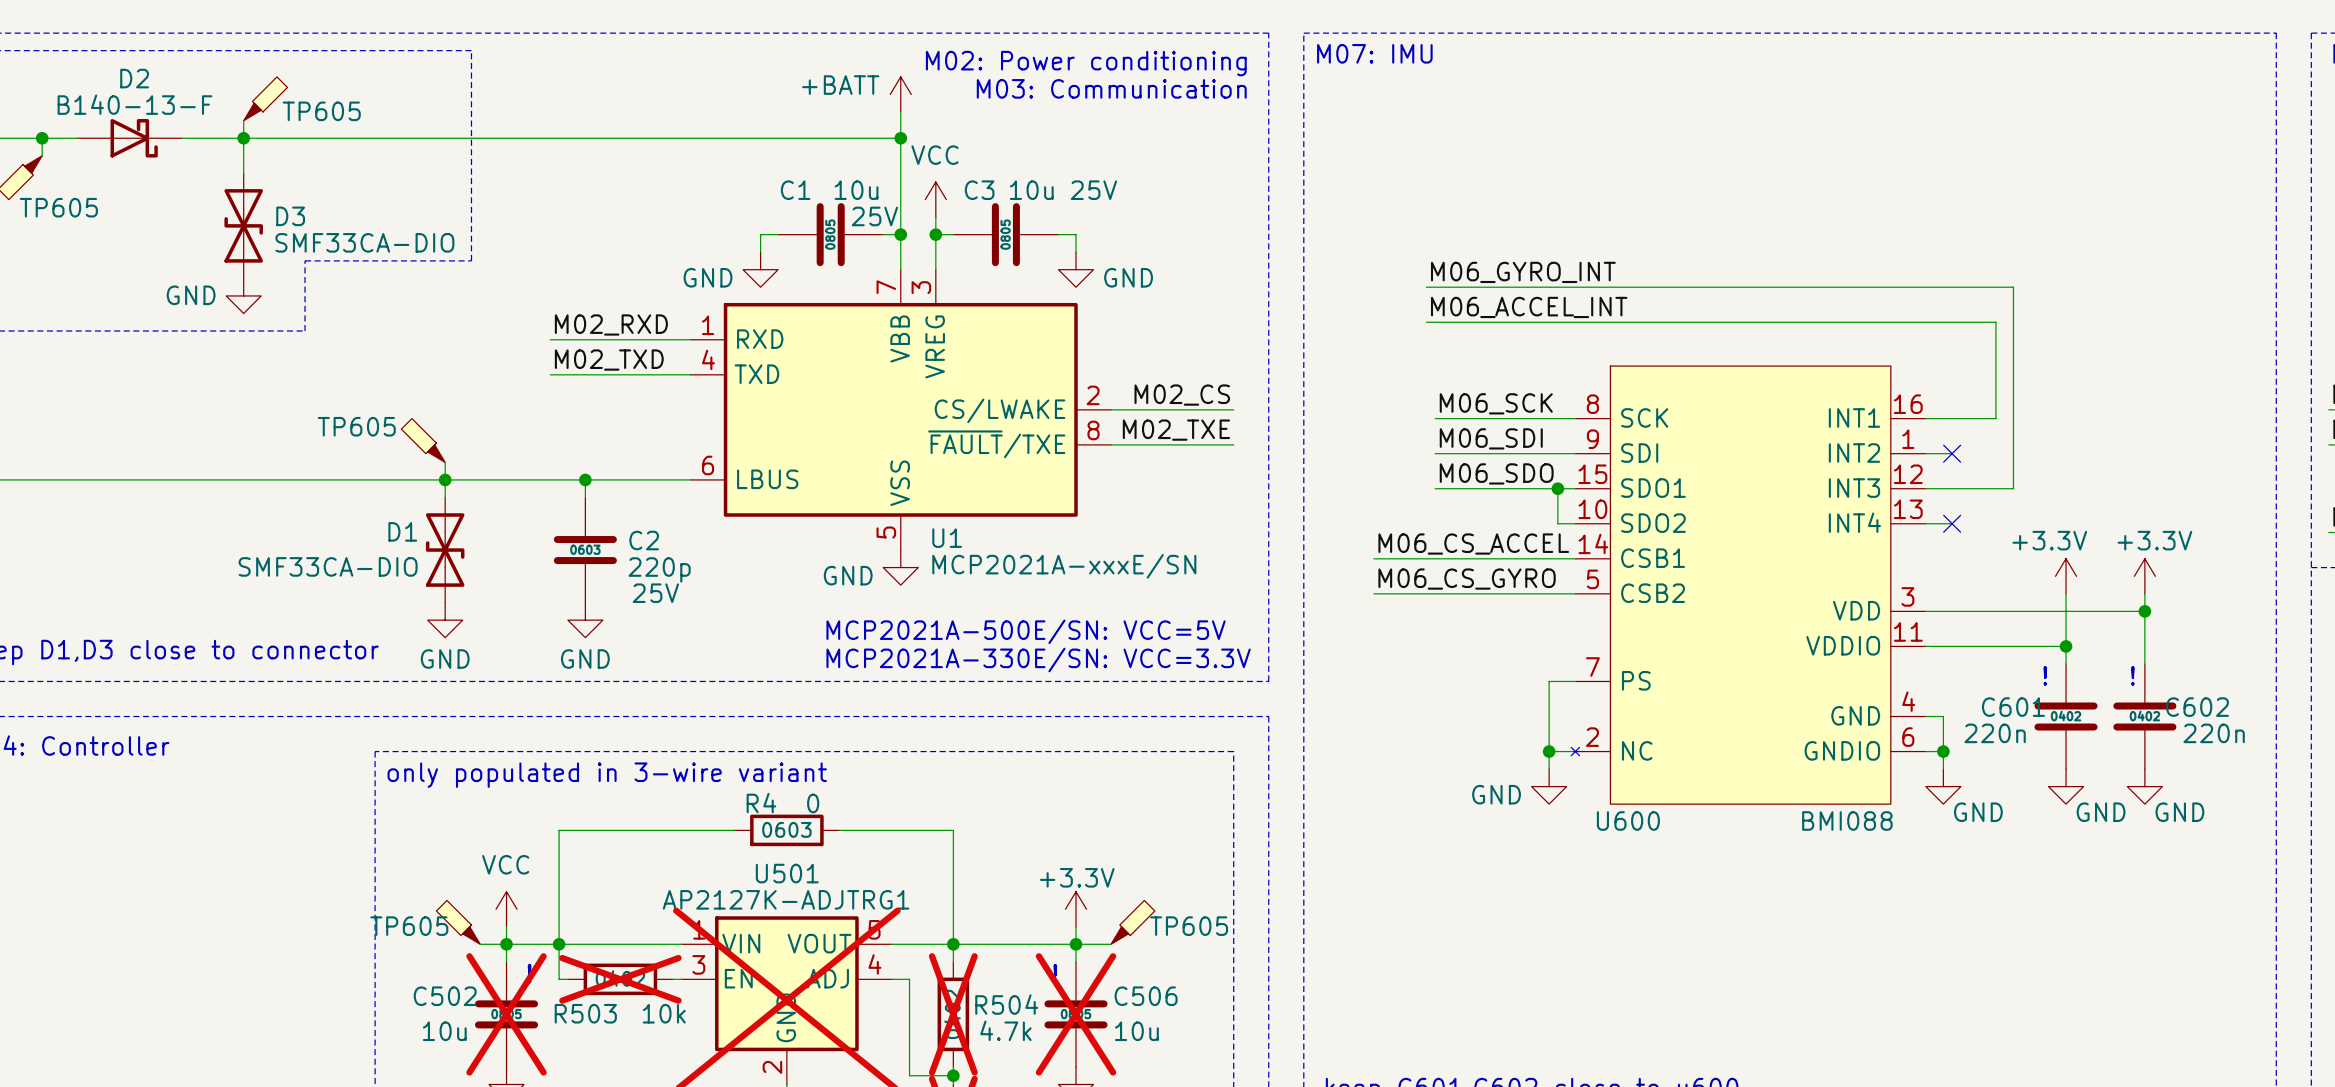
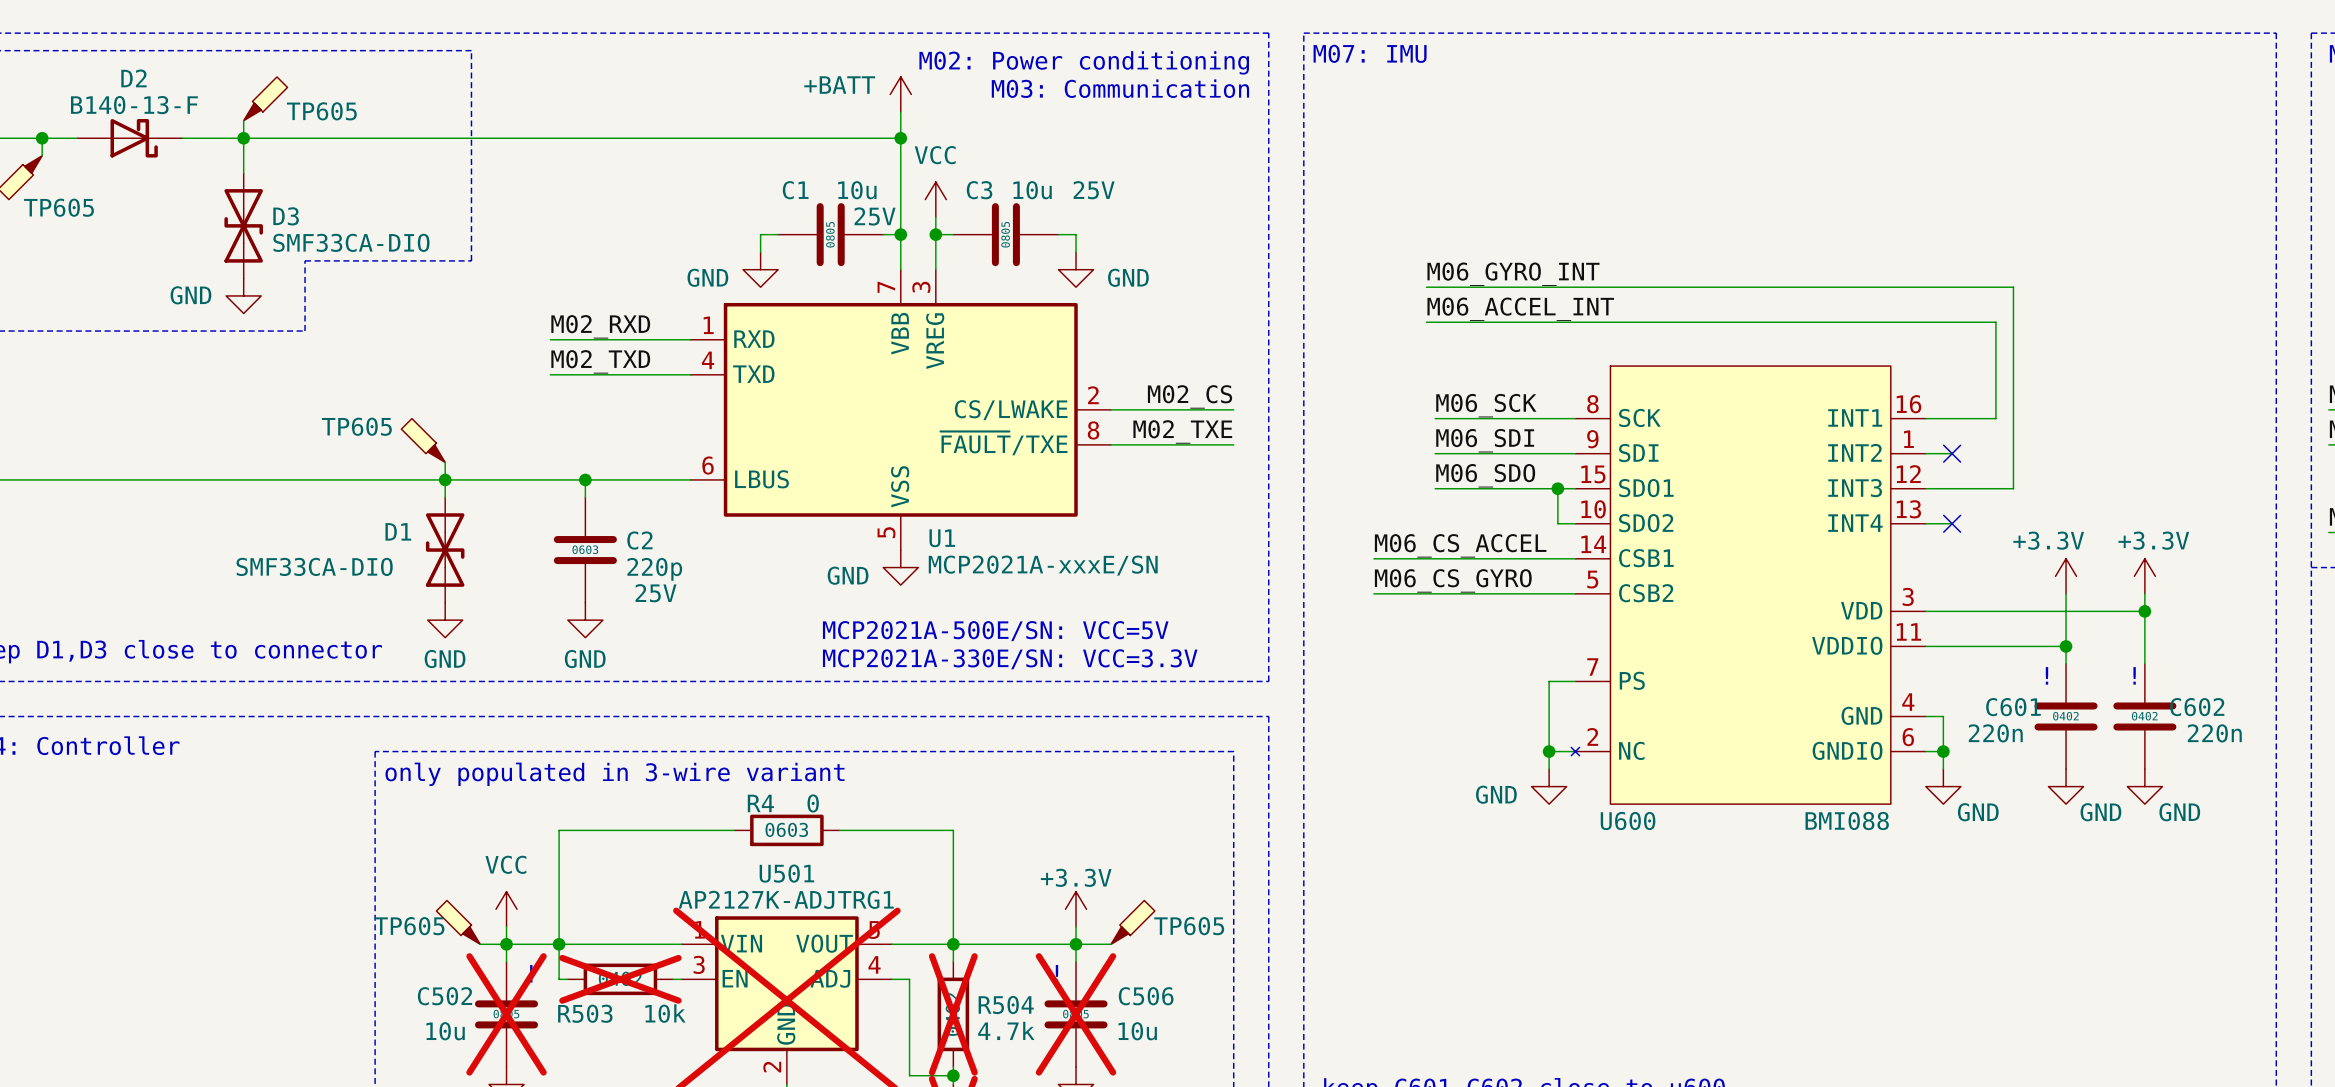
R4 text: none -> 0603 (786, 829)
R4 text: 0603 (786, 829) -> none

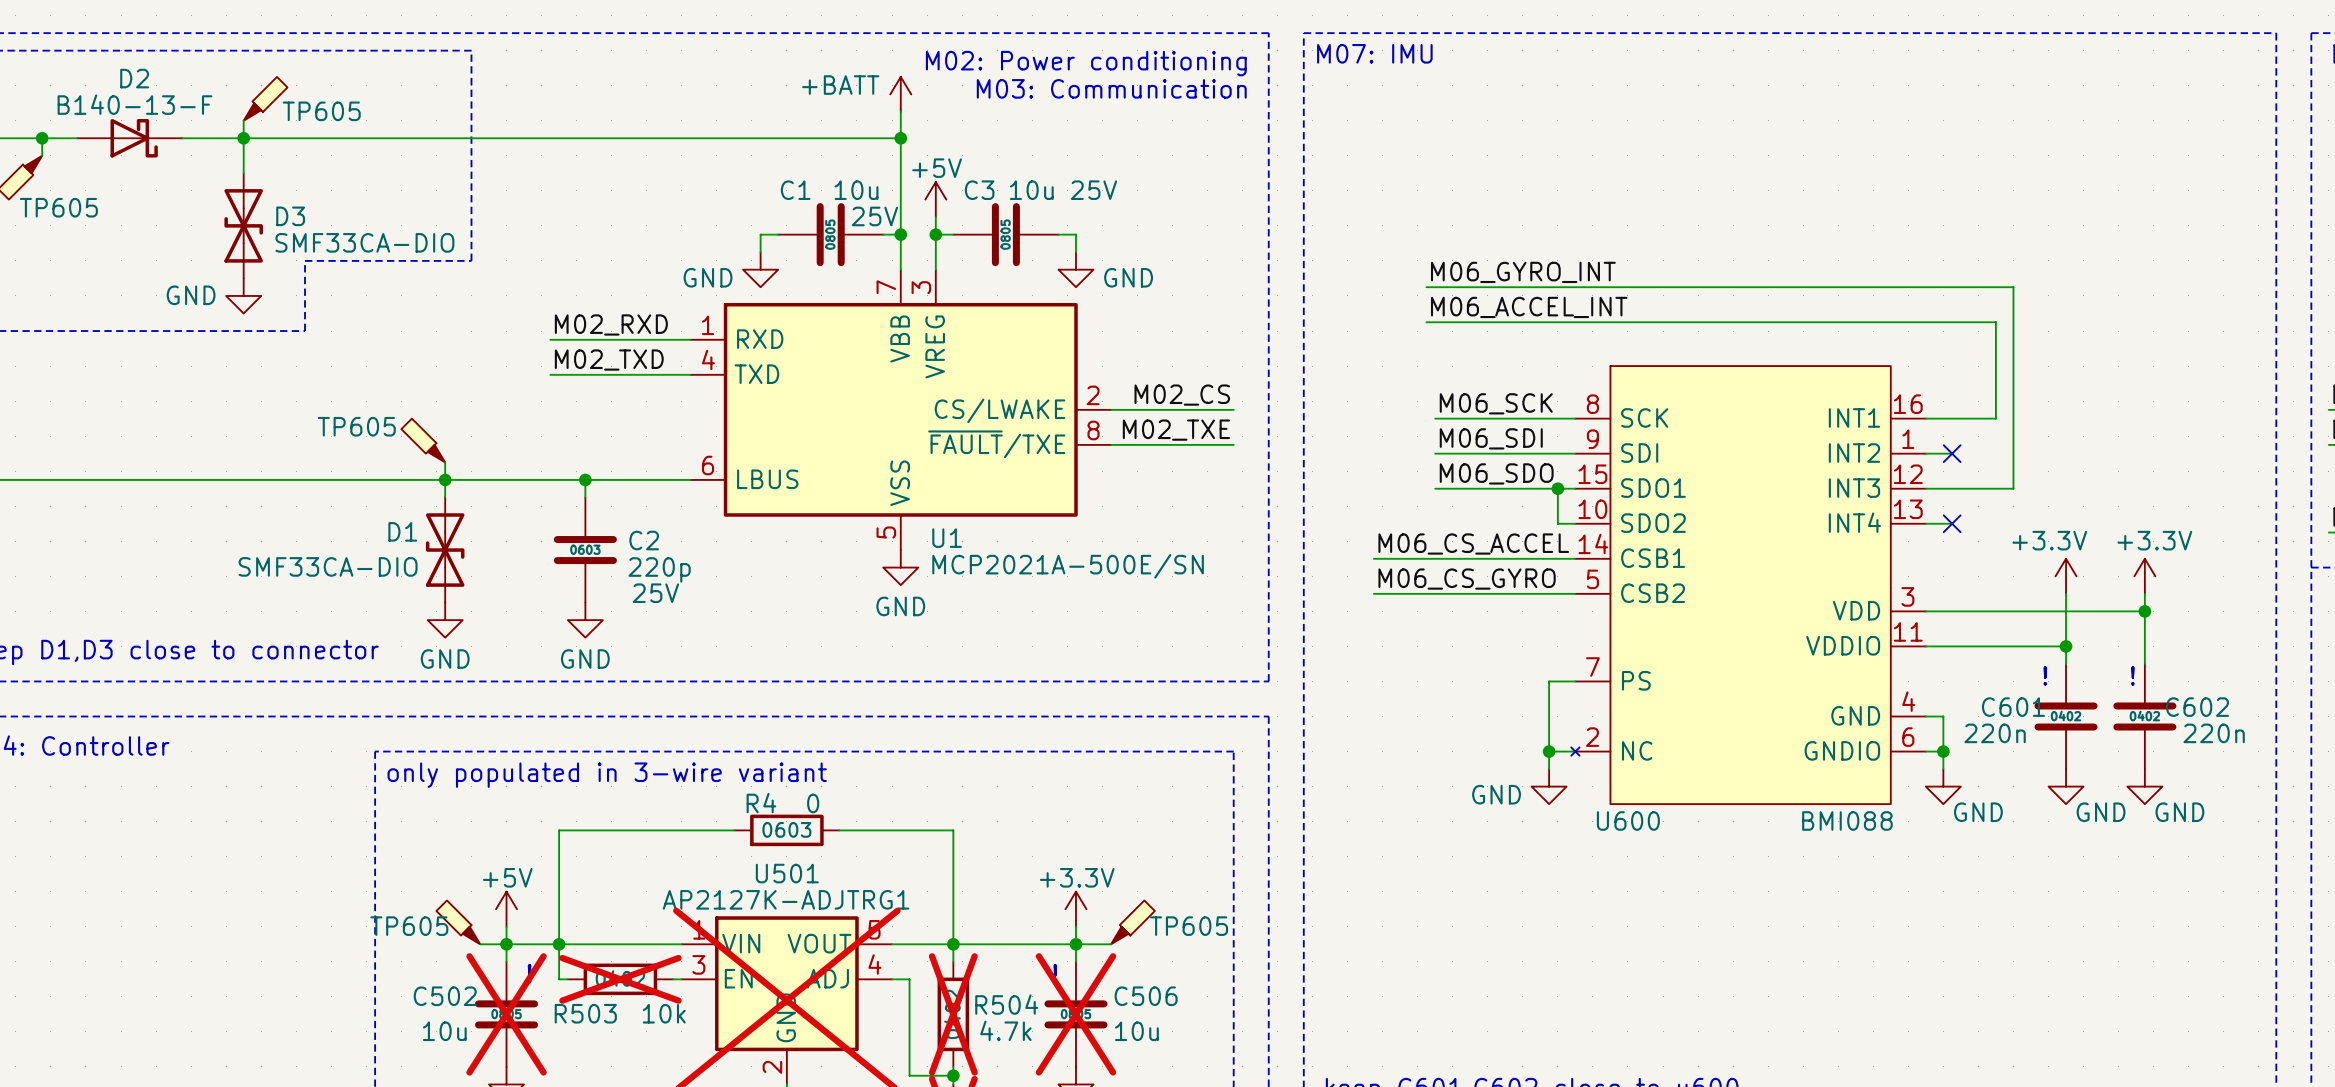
power symbol: VCC (935, 199) -> +5V (935, 199)
U1 value: MCP2021A-xxxE/SN (1043, 565) -> MCP2021A-500E/SN (1068, 566)
power symbol text position: GND (848, 575) -> GND (900, 606)
text: MCP2021A-500E/SN: VCC=5V (995, 631) -> none
text: MCP2021A-330E/SN: VCC=3.3V (1010, 659) -> none
power symbol: VCC (506, 909) -> +5V (506, 909)

